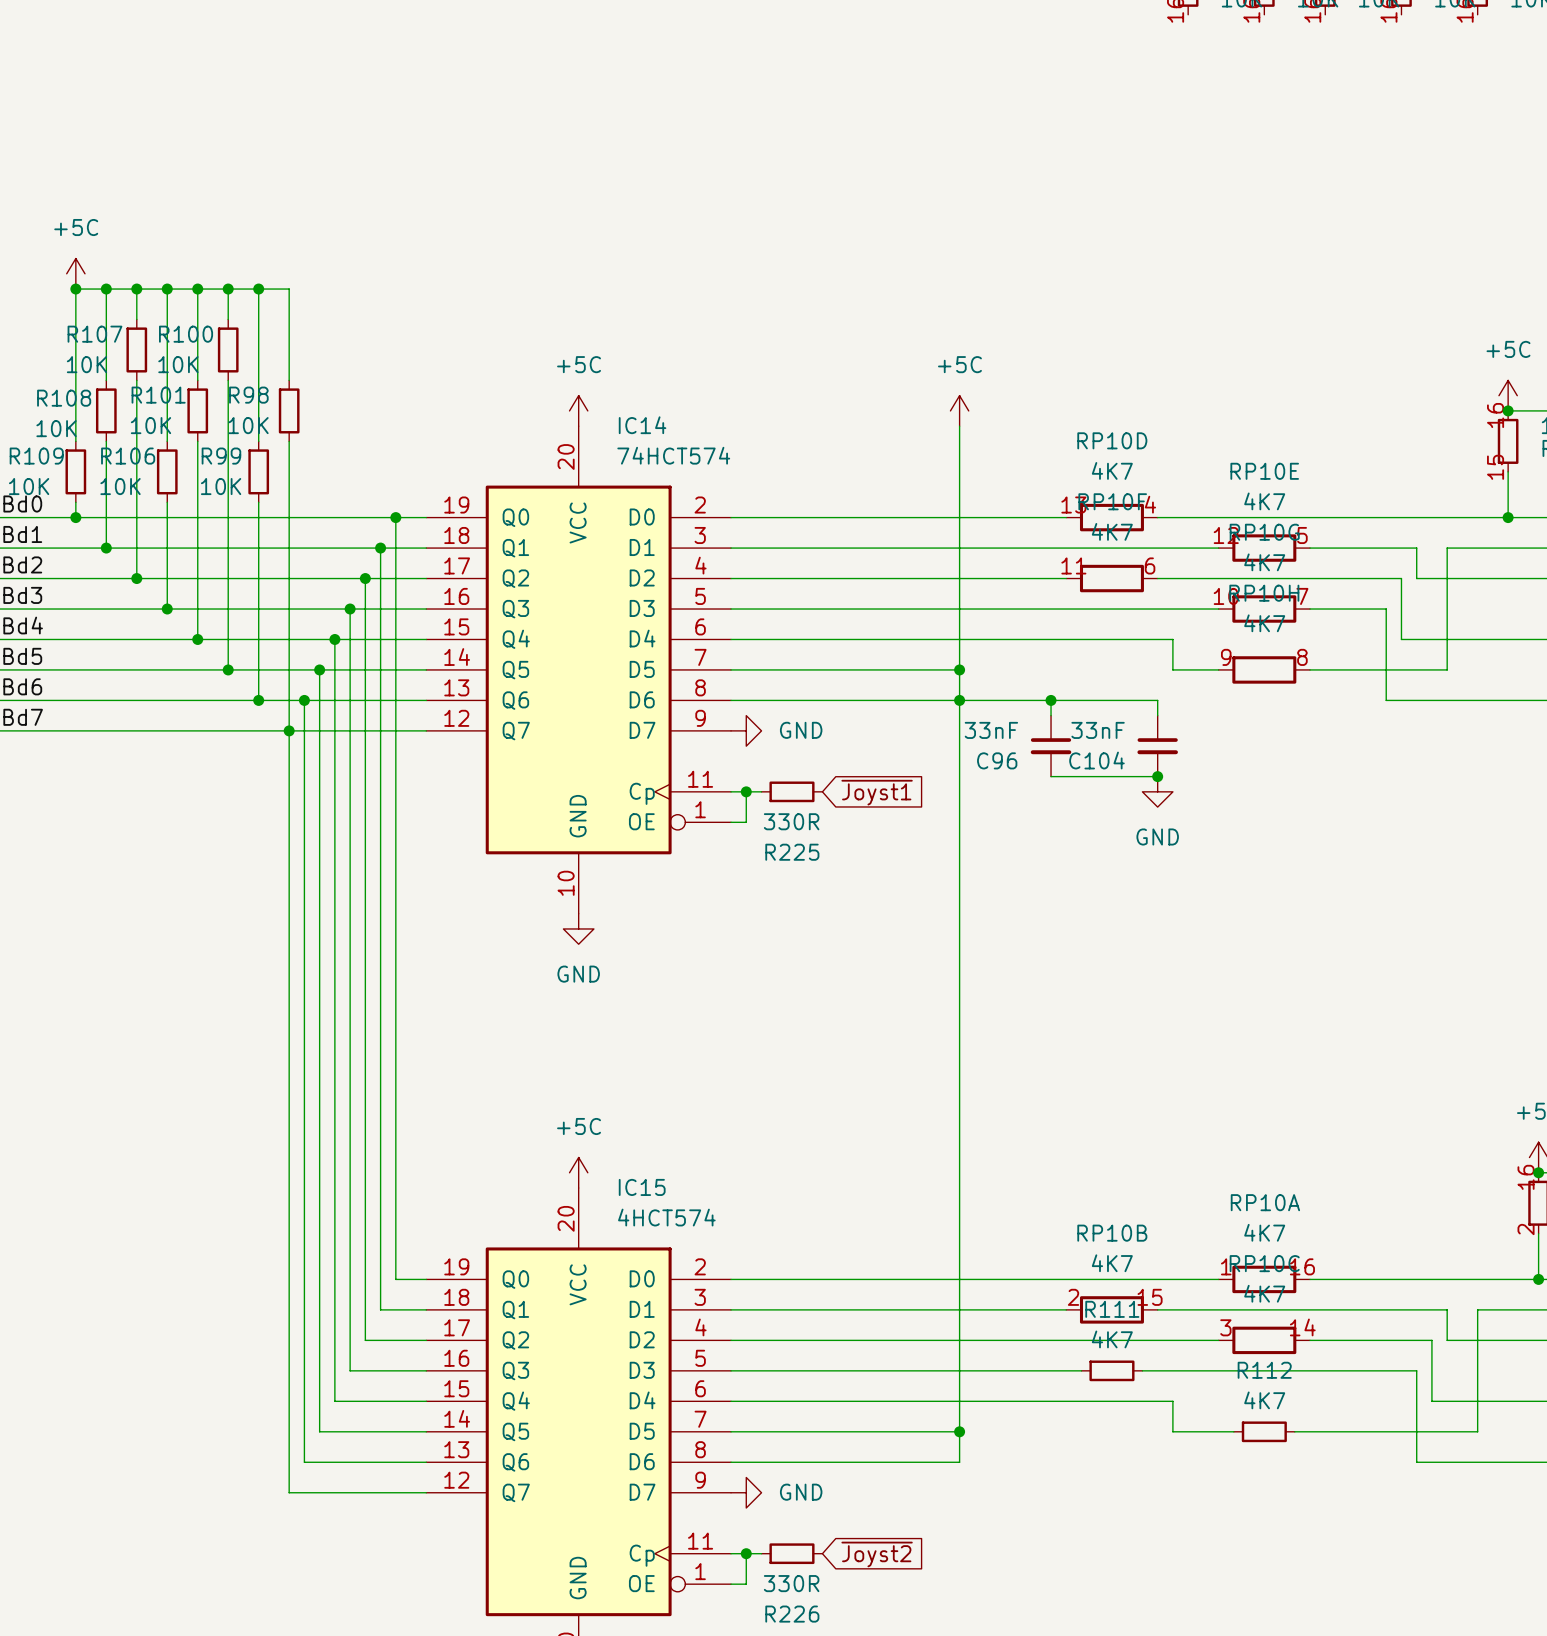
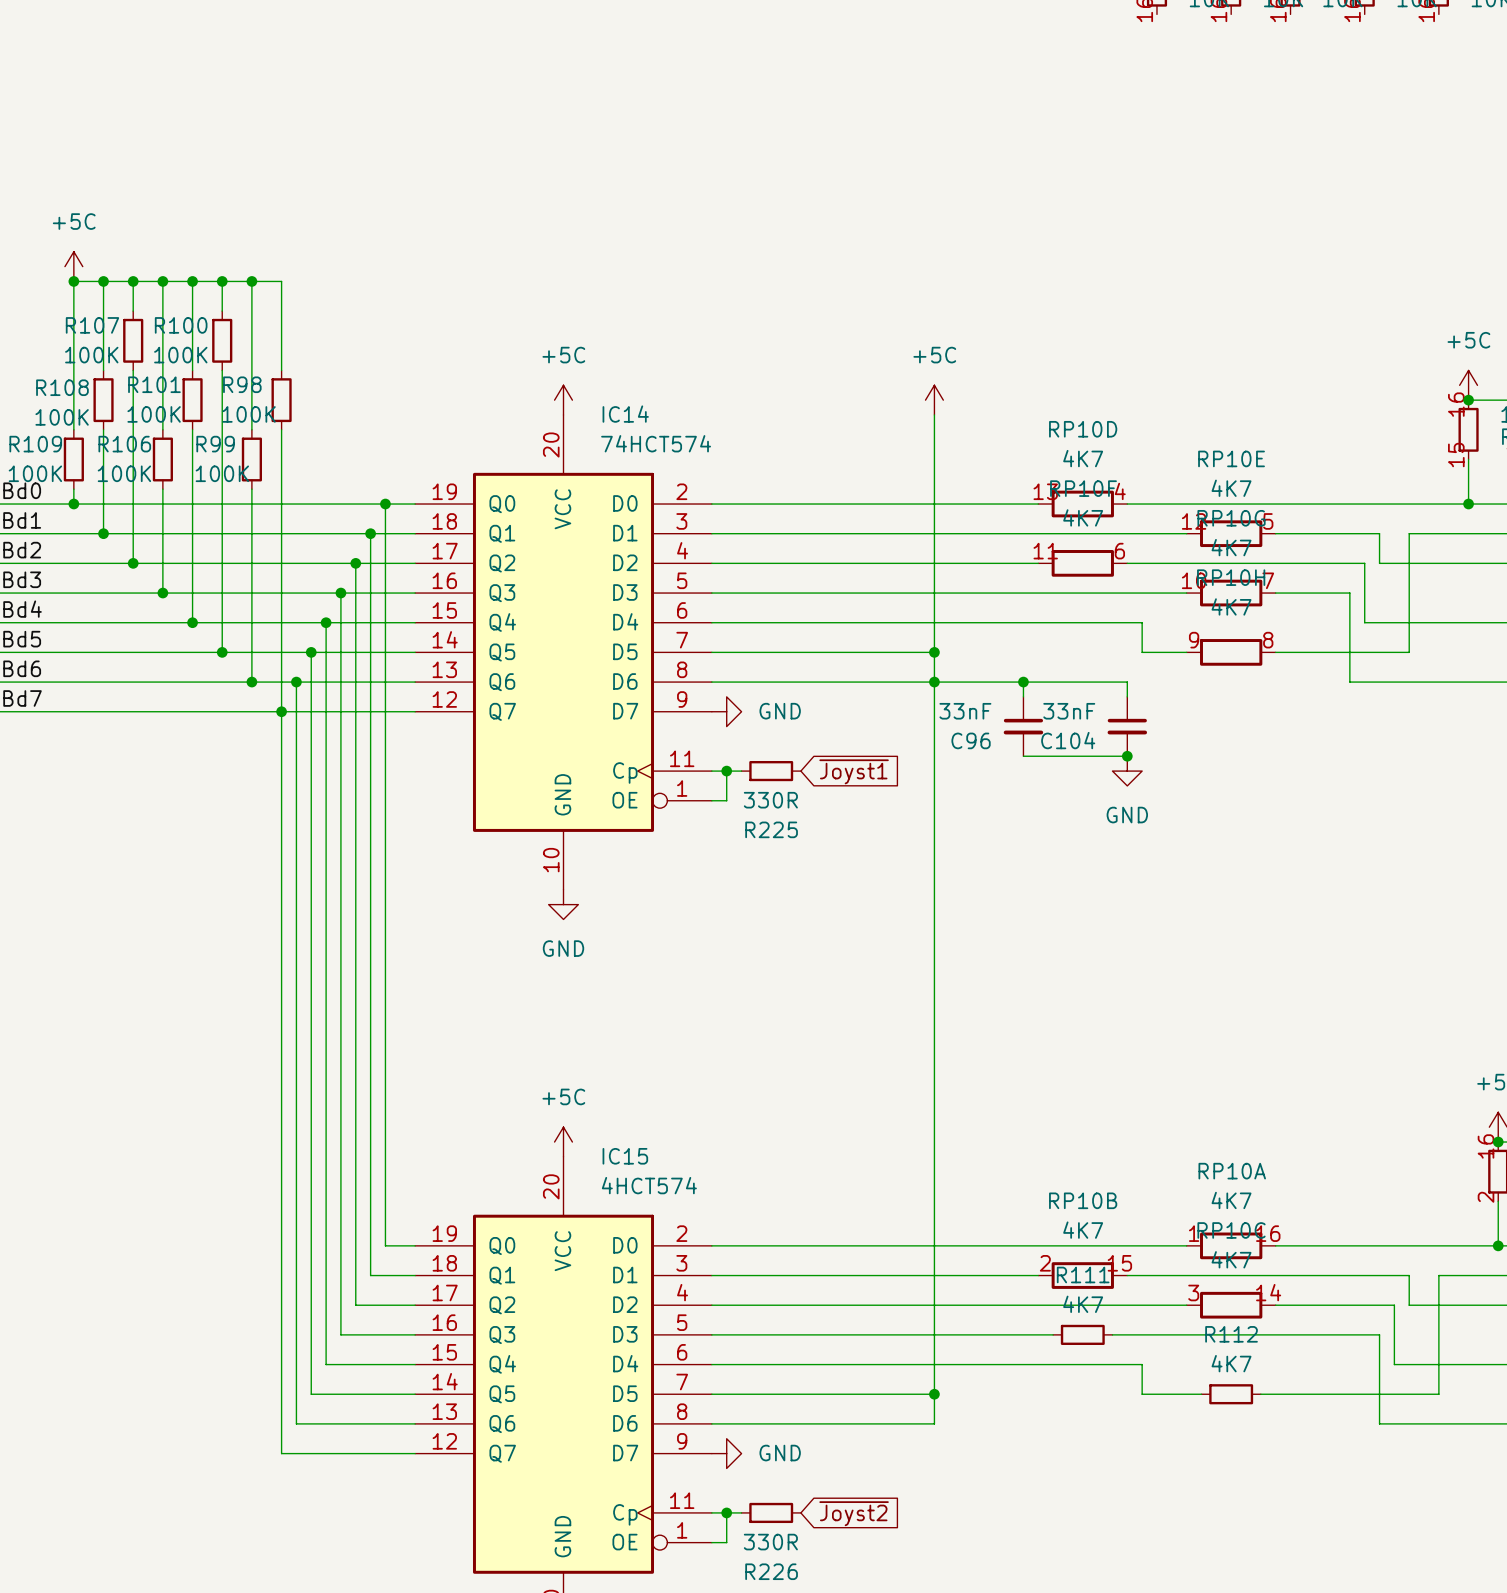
R107 value: 10K (86, 364) -> 100K (91, 355)
R100 value: 10K (178, 364) -> 100K (180, 355)
R101 value: 10K (150, 425) -> 100K (154, 414)
R98 value: 10K (248, 425) -> 100K (249, 414)
R108 value: 10K (56, 428) -> 100K (62, 417)
R109 value: 10K (29, 486) -> 100K (35, 473)
R106 value: 10K (120, 486) -> 100K (124, 473)
R99 value: 10K (221, 486) -> 100K (222, 473)

